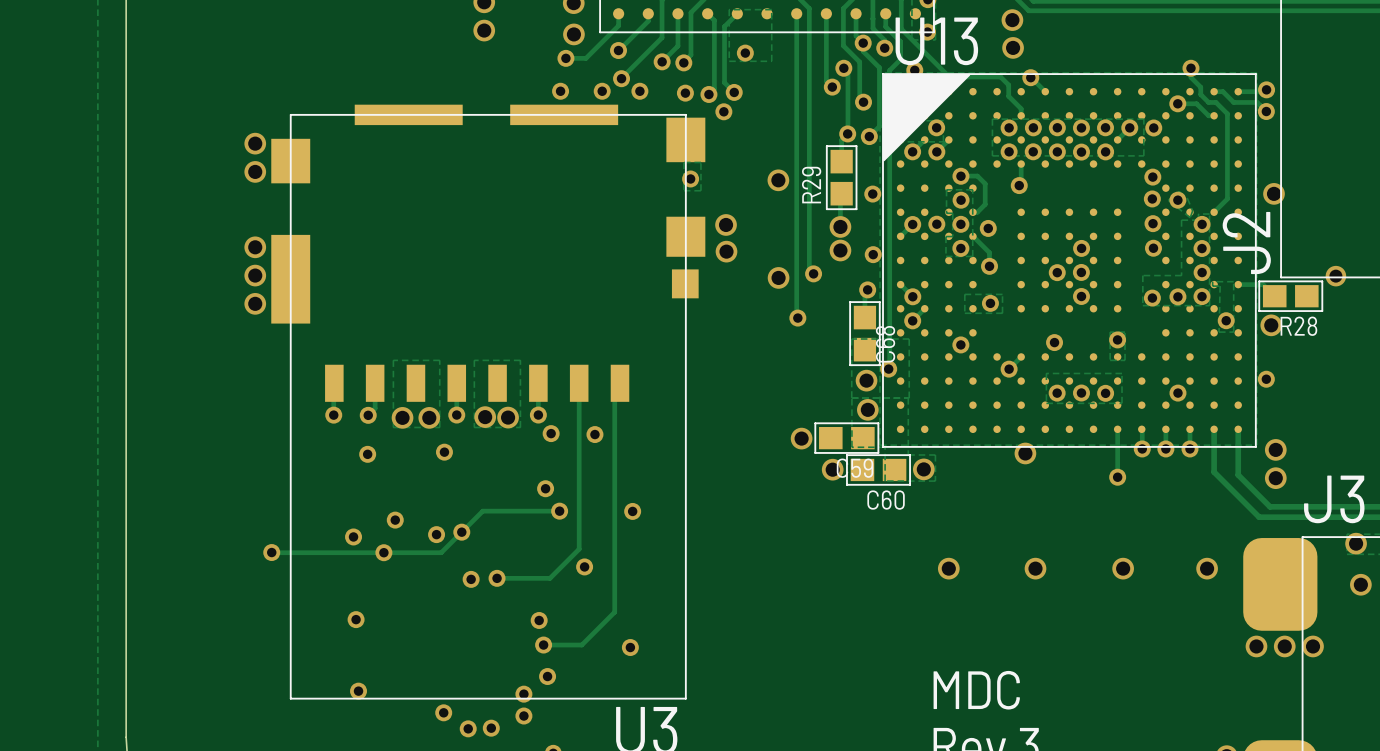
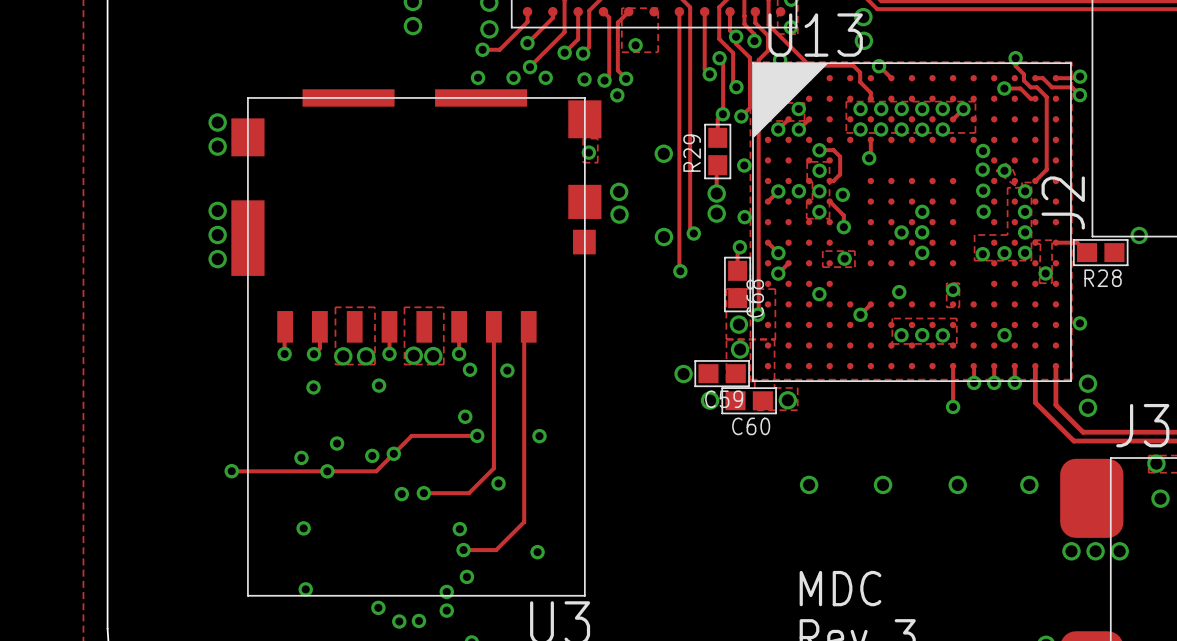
via: (1153, 128) -> none
via: (1274, 193) -> none
via: (1271, 325) -> none
via: (1025, 453) -> none

